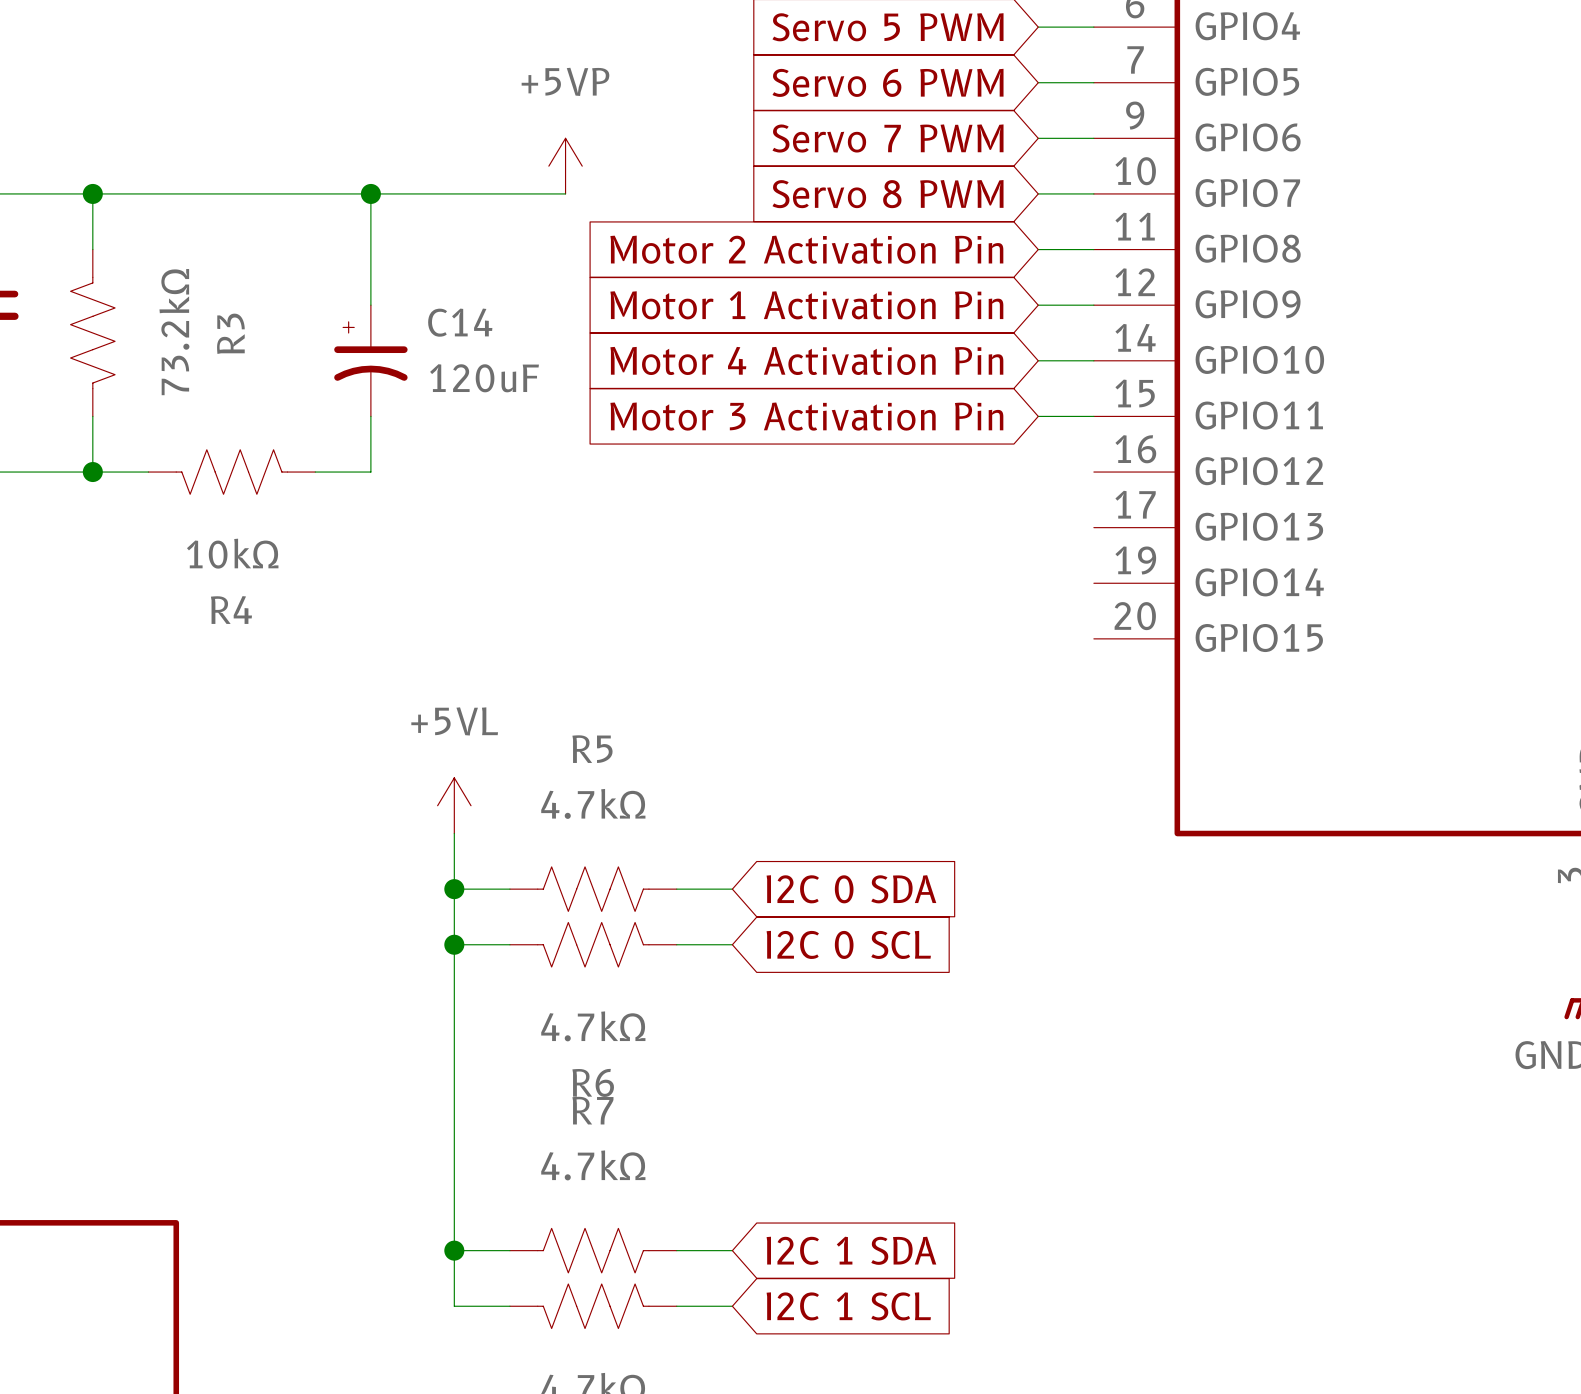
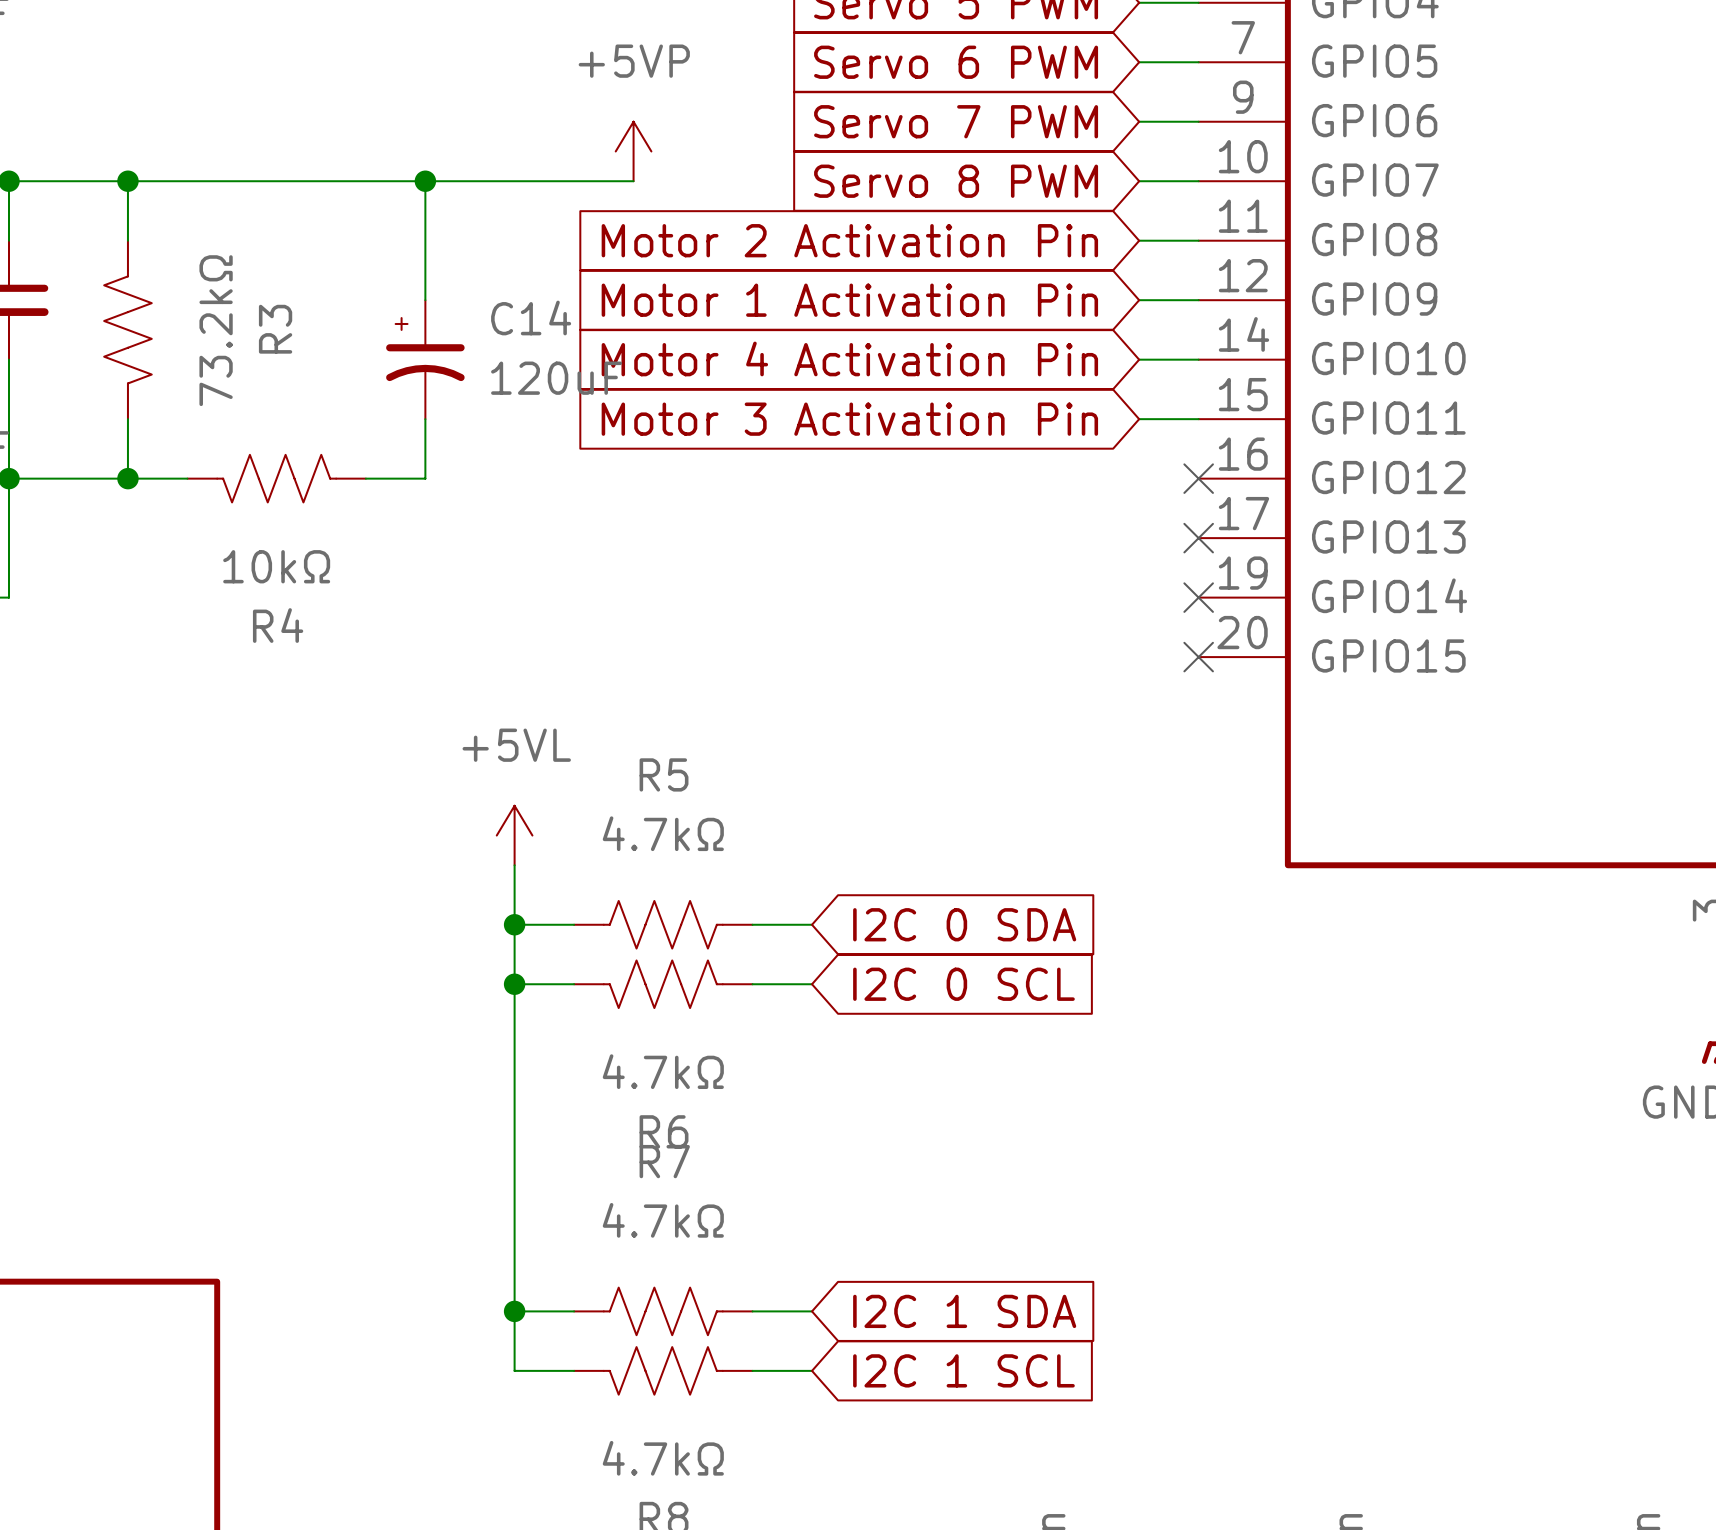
no-connect mark: none -> (1198, 478)
no-connect mark: none -> (1198, 538)
no-connect mark: none -> (1198, 597)
no-connect mark: none -> (1198, 657)

